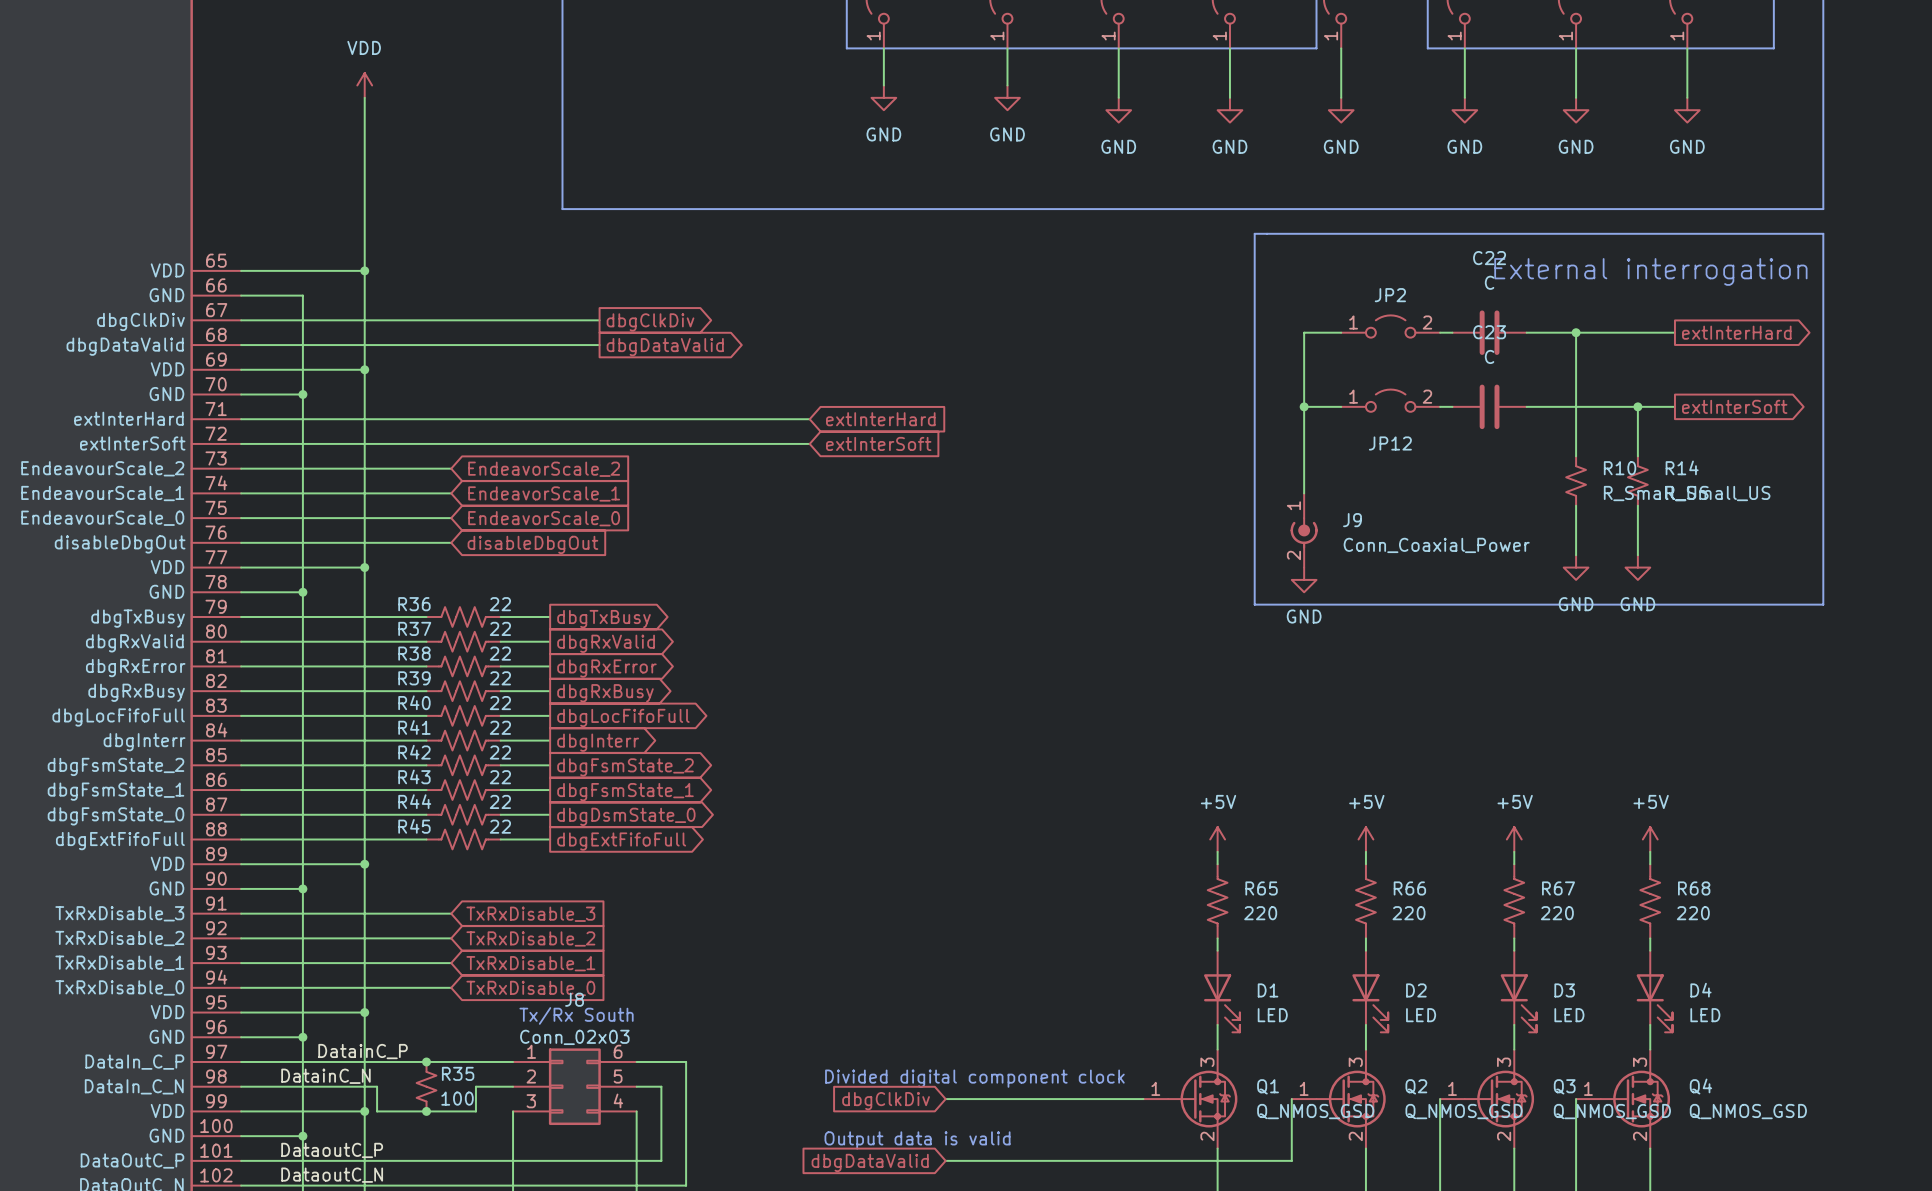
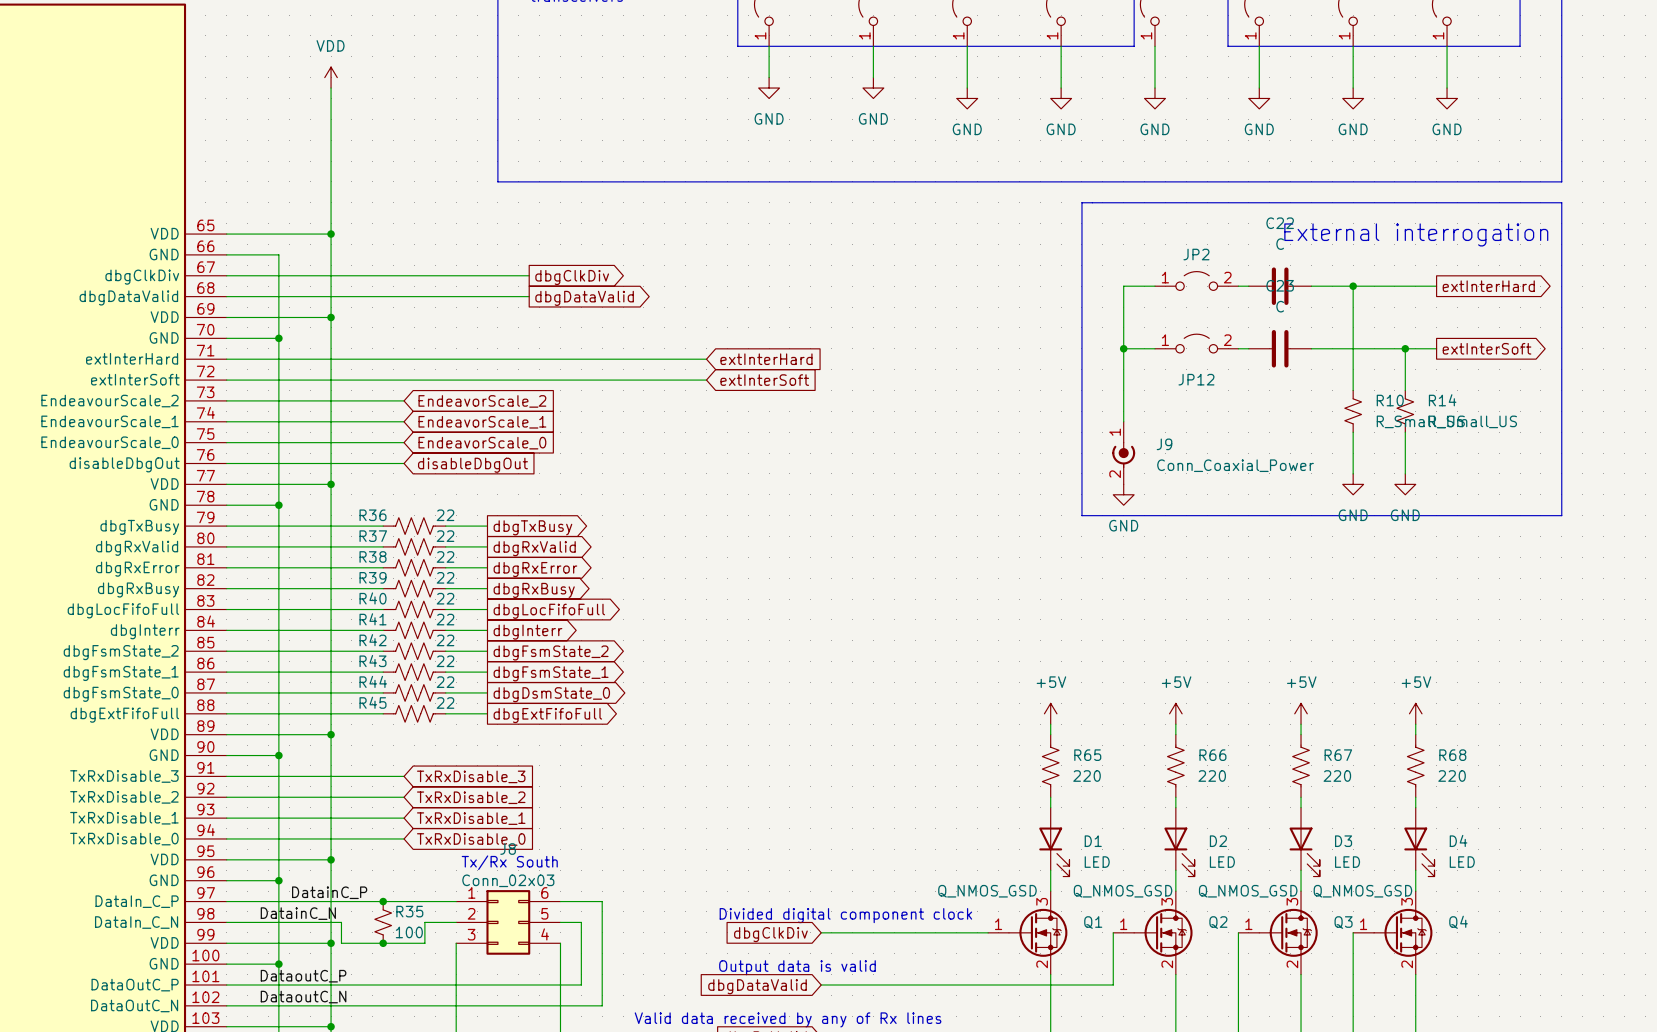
Q1 value position: Q_NMOS_GSD (1315, 1111) -> Q_NMOS_GSD (987, 891)
Q2 value position: Q_NMOS_GSD (1464, 1111) -> Q_NMOS_GSD (1123, 891)
Q3 value position: Q_NMOS_GSD (1612, 1111) -> Q_NMOS_GSD (1248, 891)
Q4 value position: Q_NMOS_GSD (1748, 1111) -> Q_NMOS_GSD (1362, 891)

